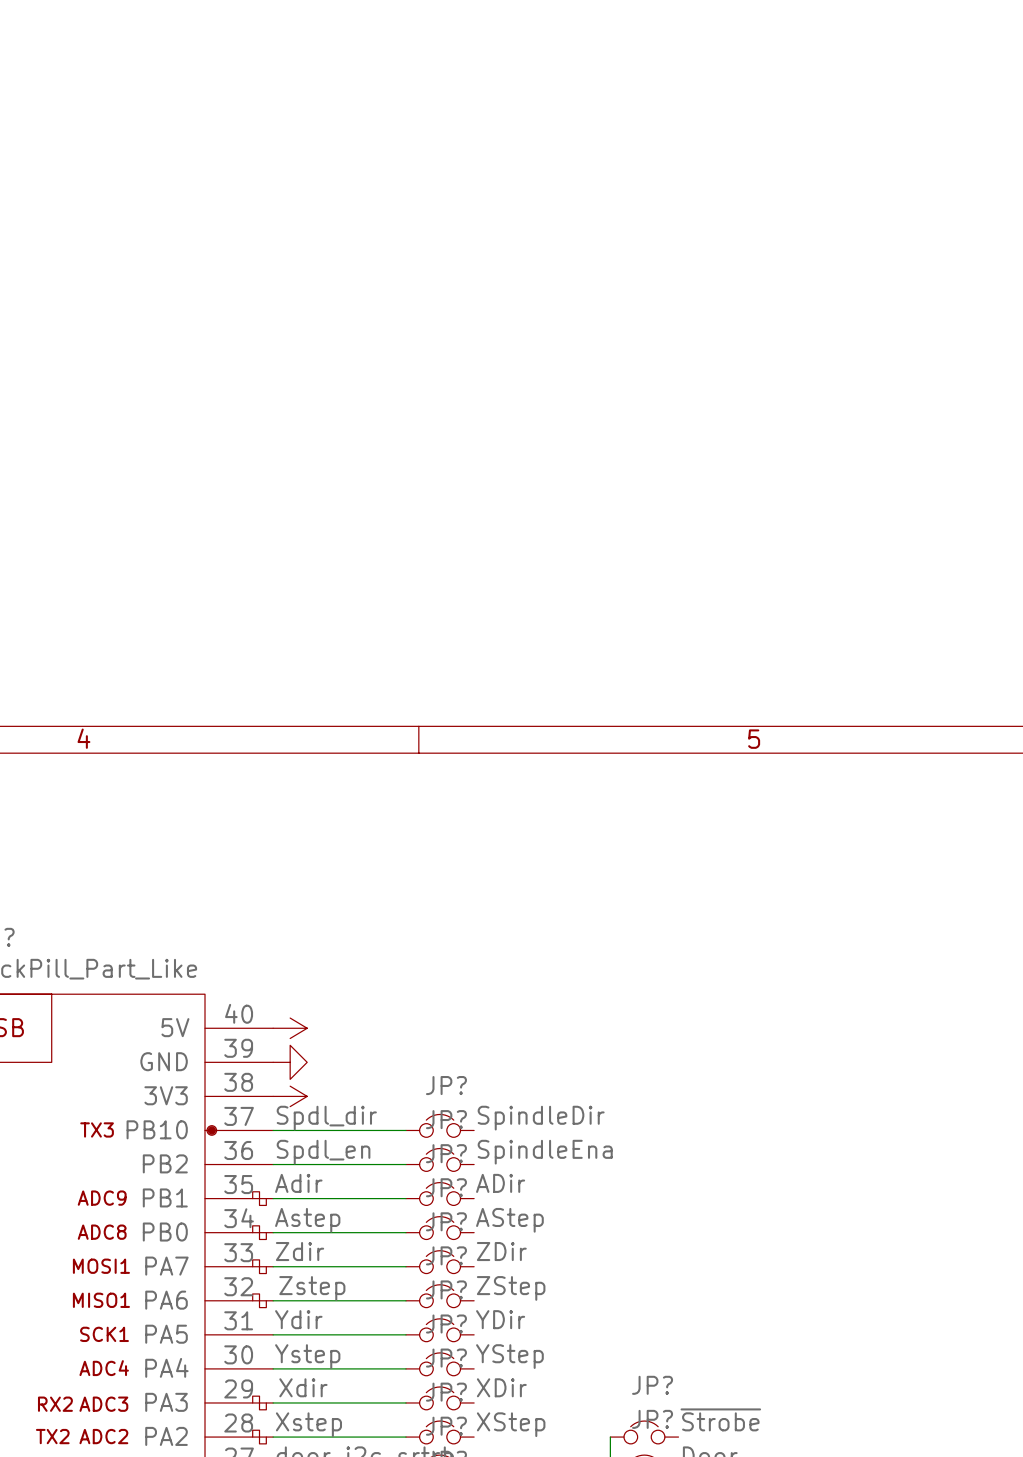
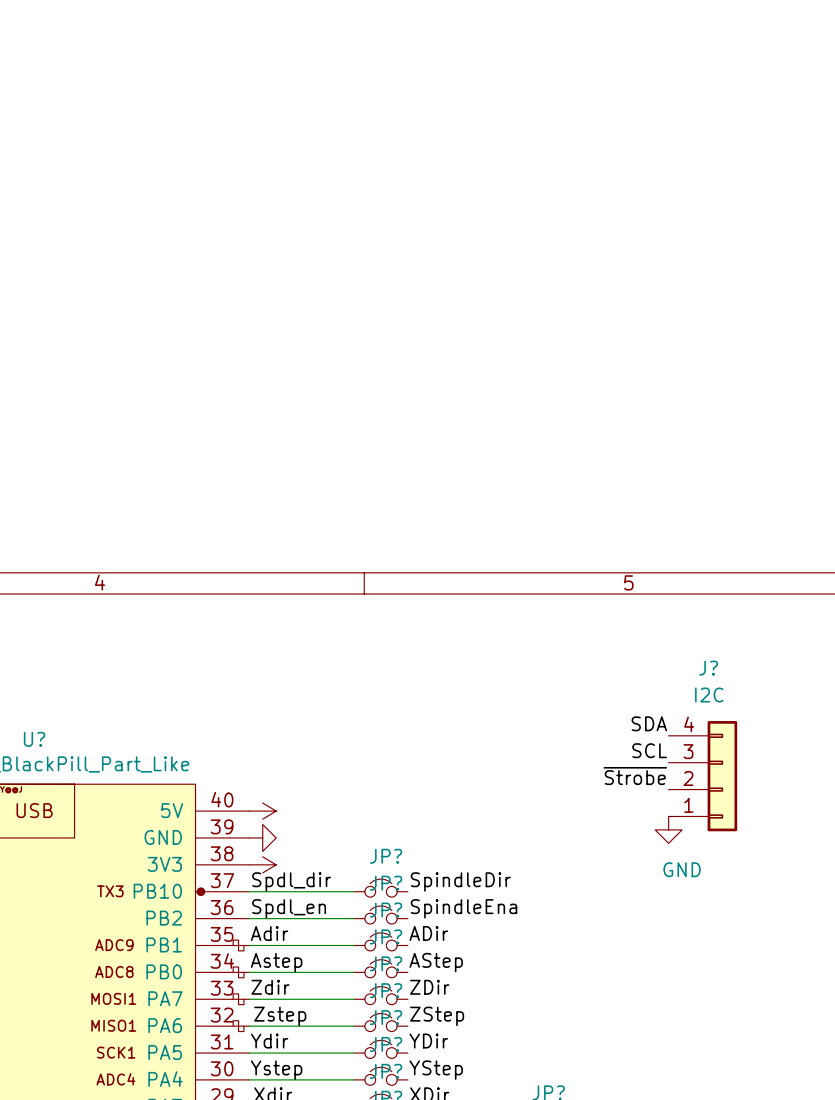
label: none -> SDA (649, 723)
label: none -> SCL (649, 750)
label: none -> ~{Strobe} (635, 776)
J?: none -> I2C (702, 776)
power symbol: none -> GND (668, 829)

